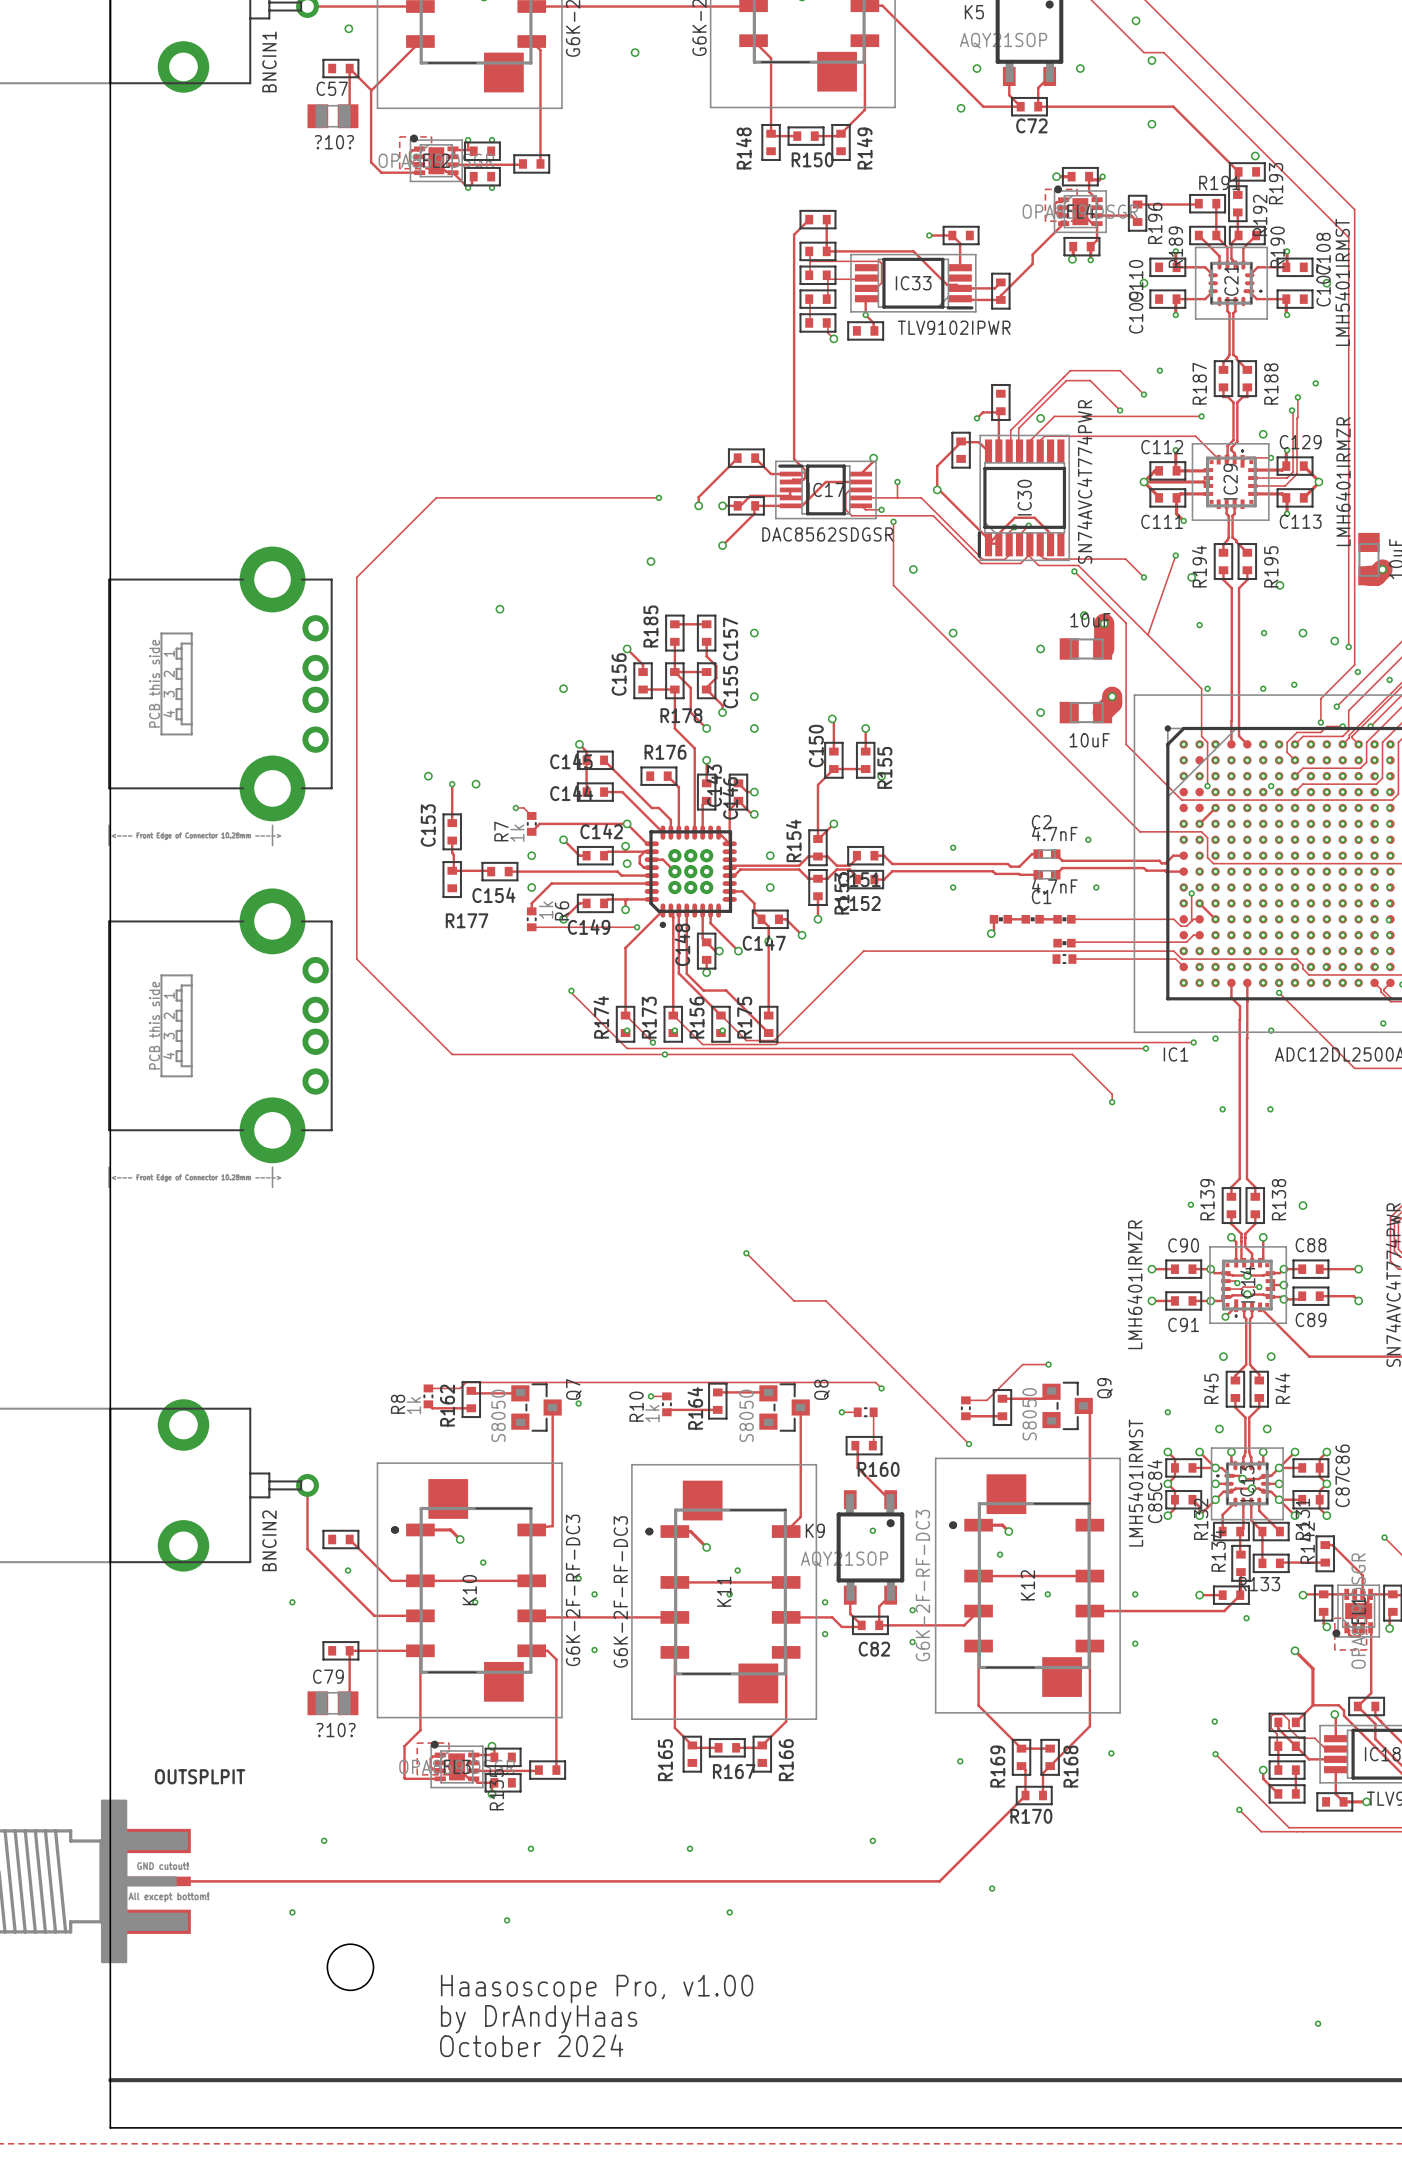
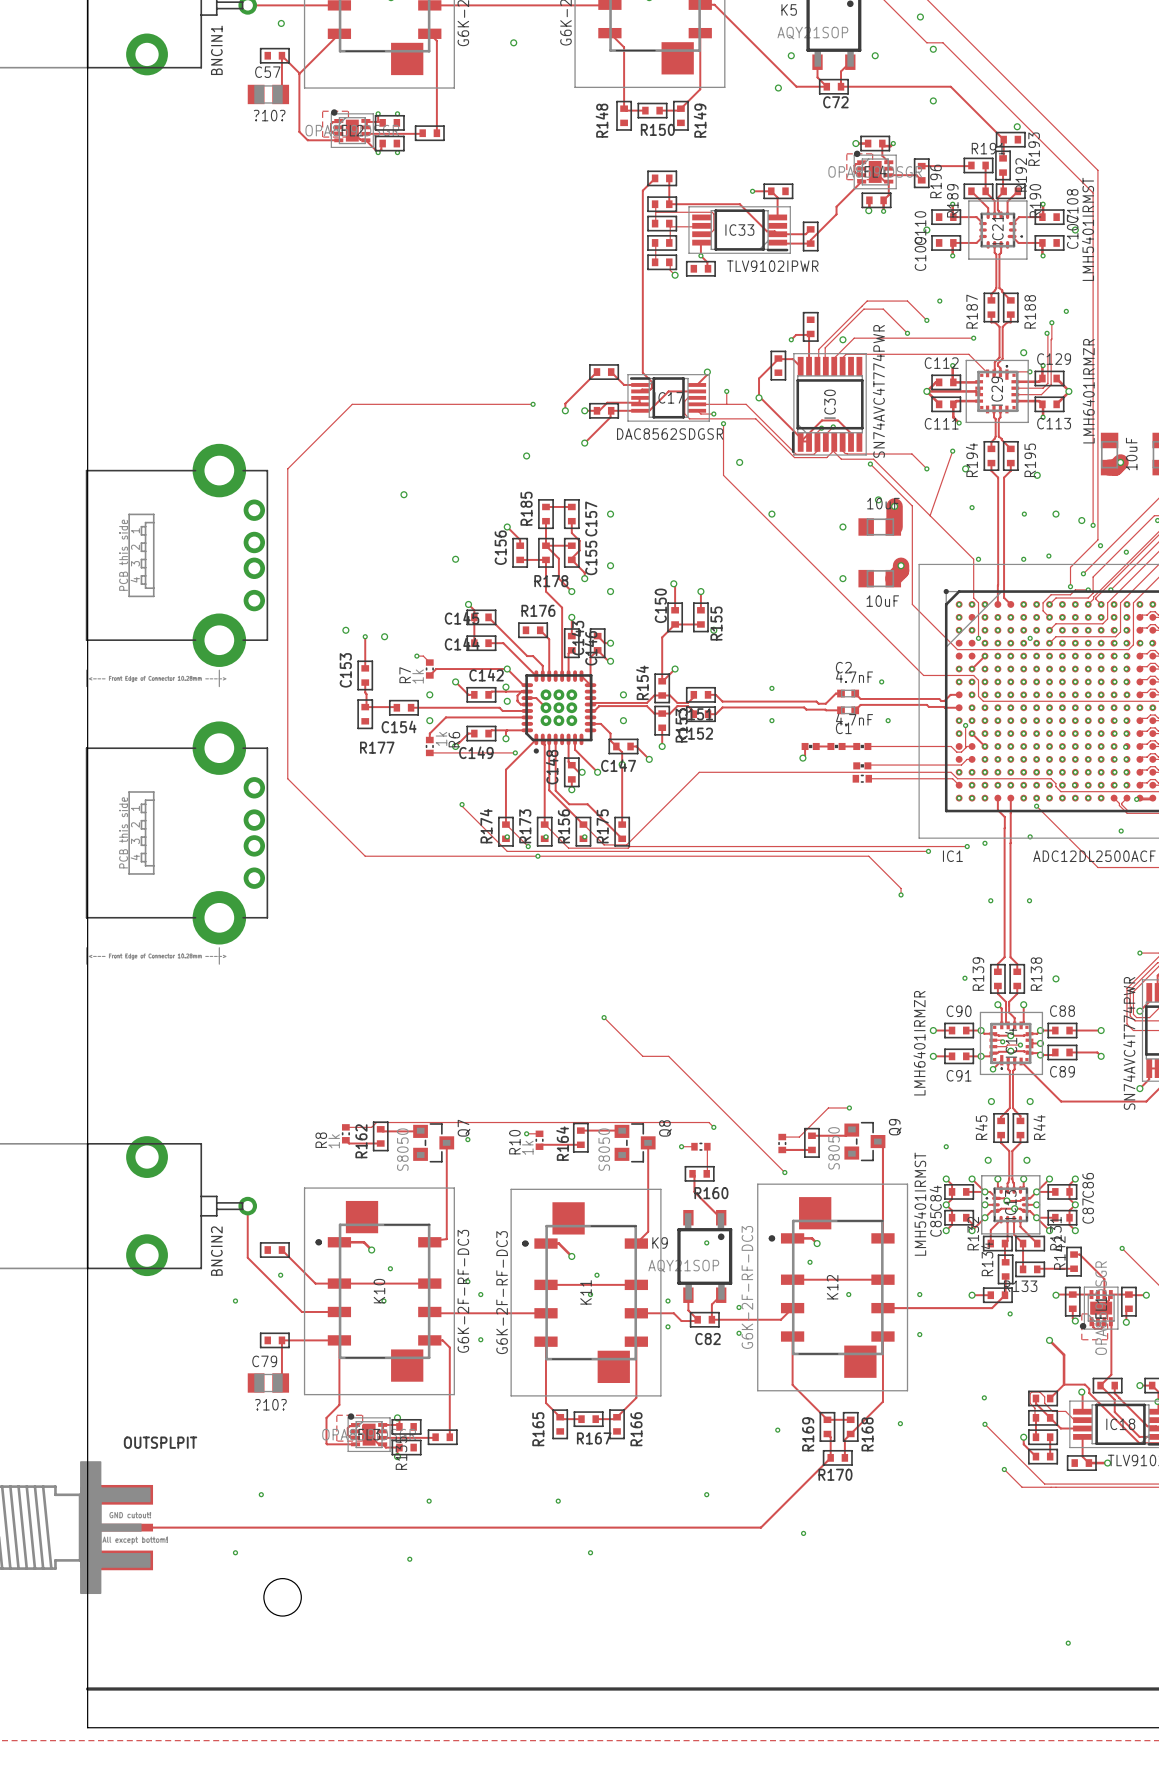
text: Haasoscope Pro, v1.00 (597, 1989) -> none
text: by DrAndyHaas (539, 2019) -> none
text: October 2024 (531, 2045) -> none

